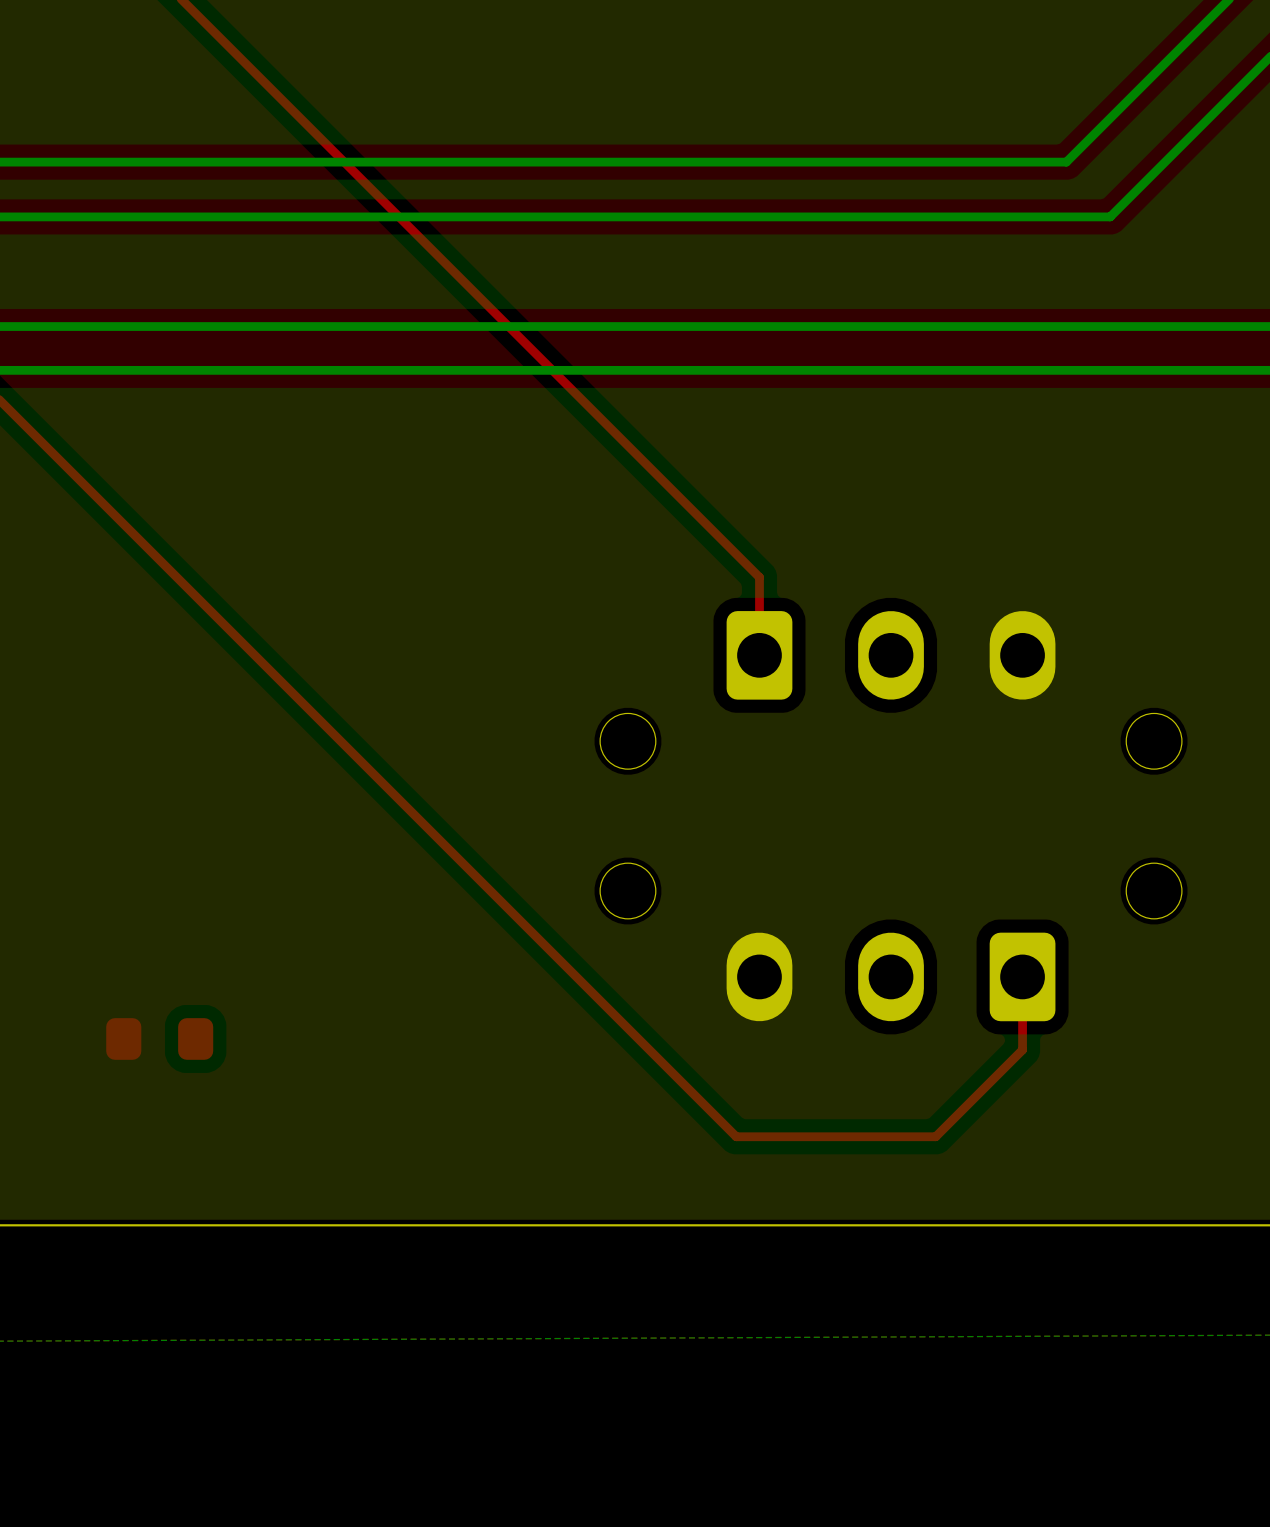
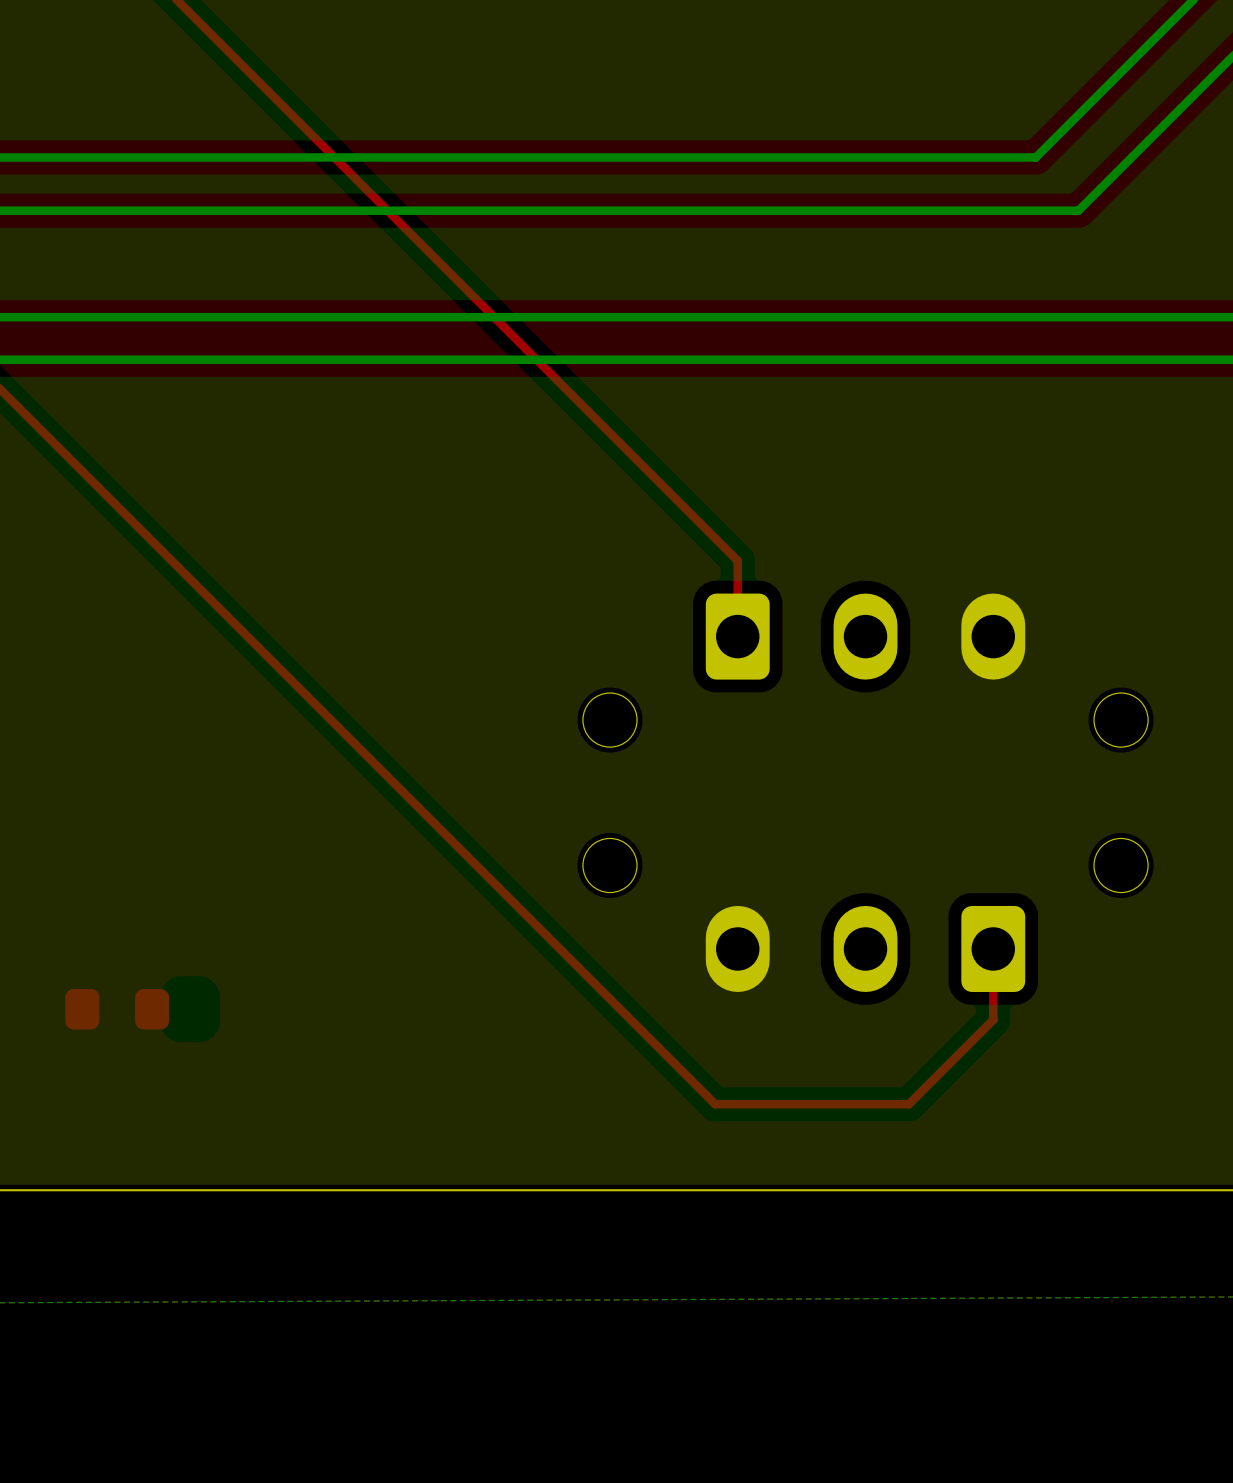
part position: (159, 1038) -> (117, 1009)

